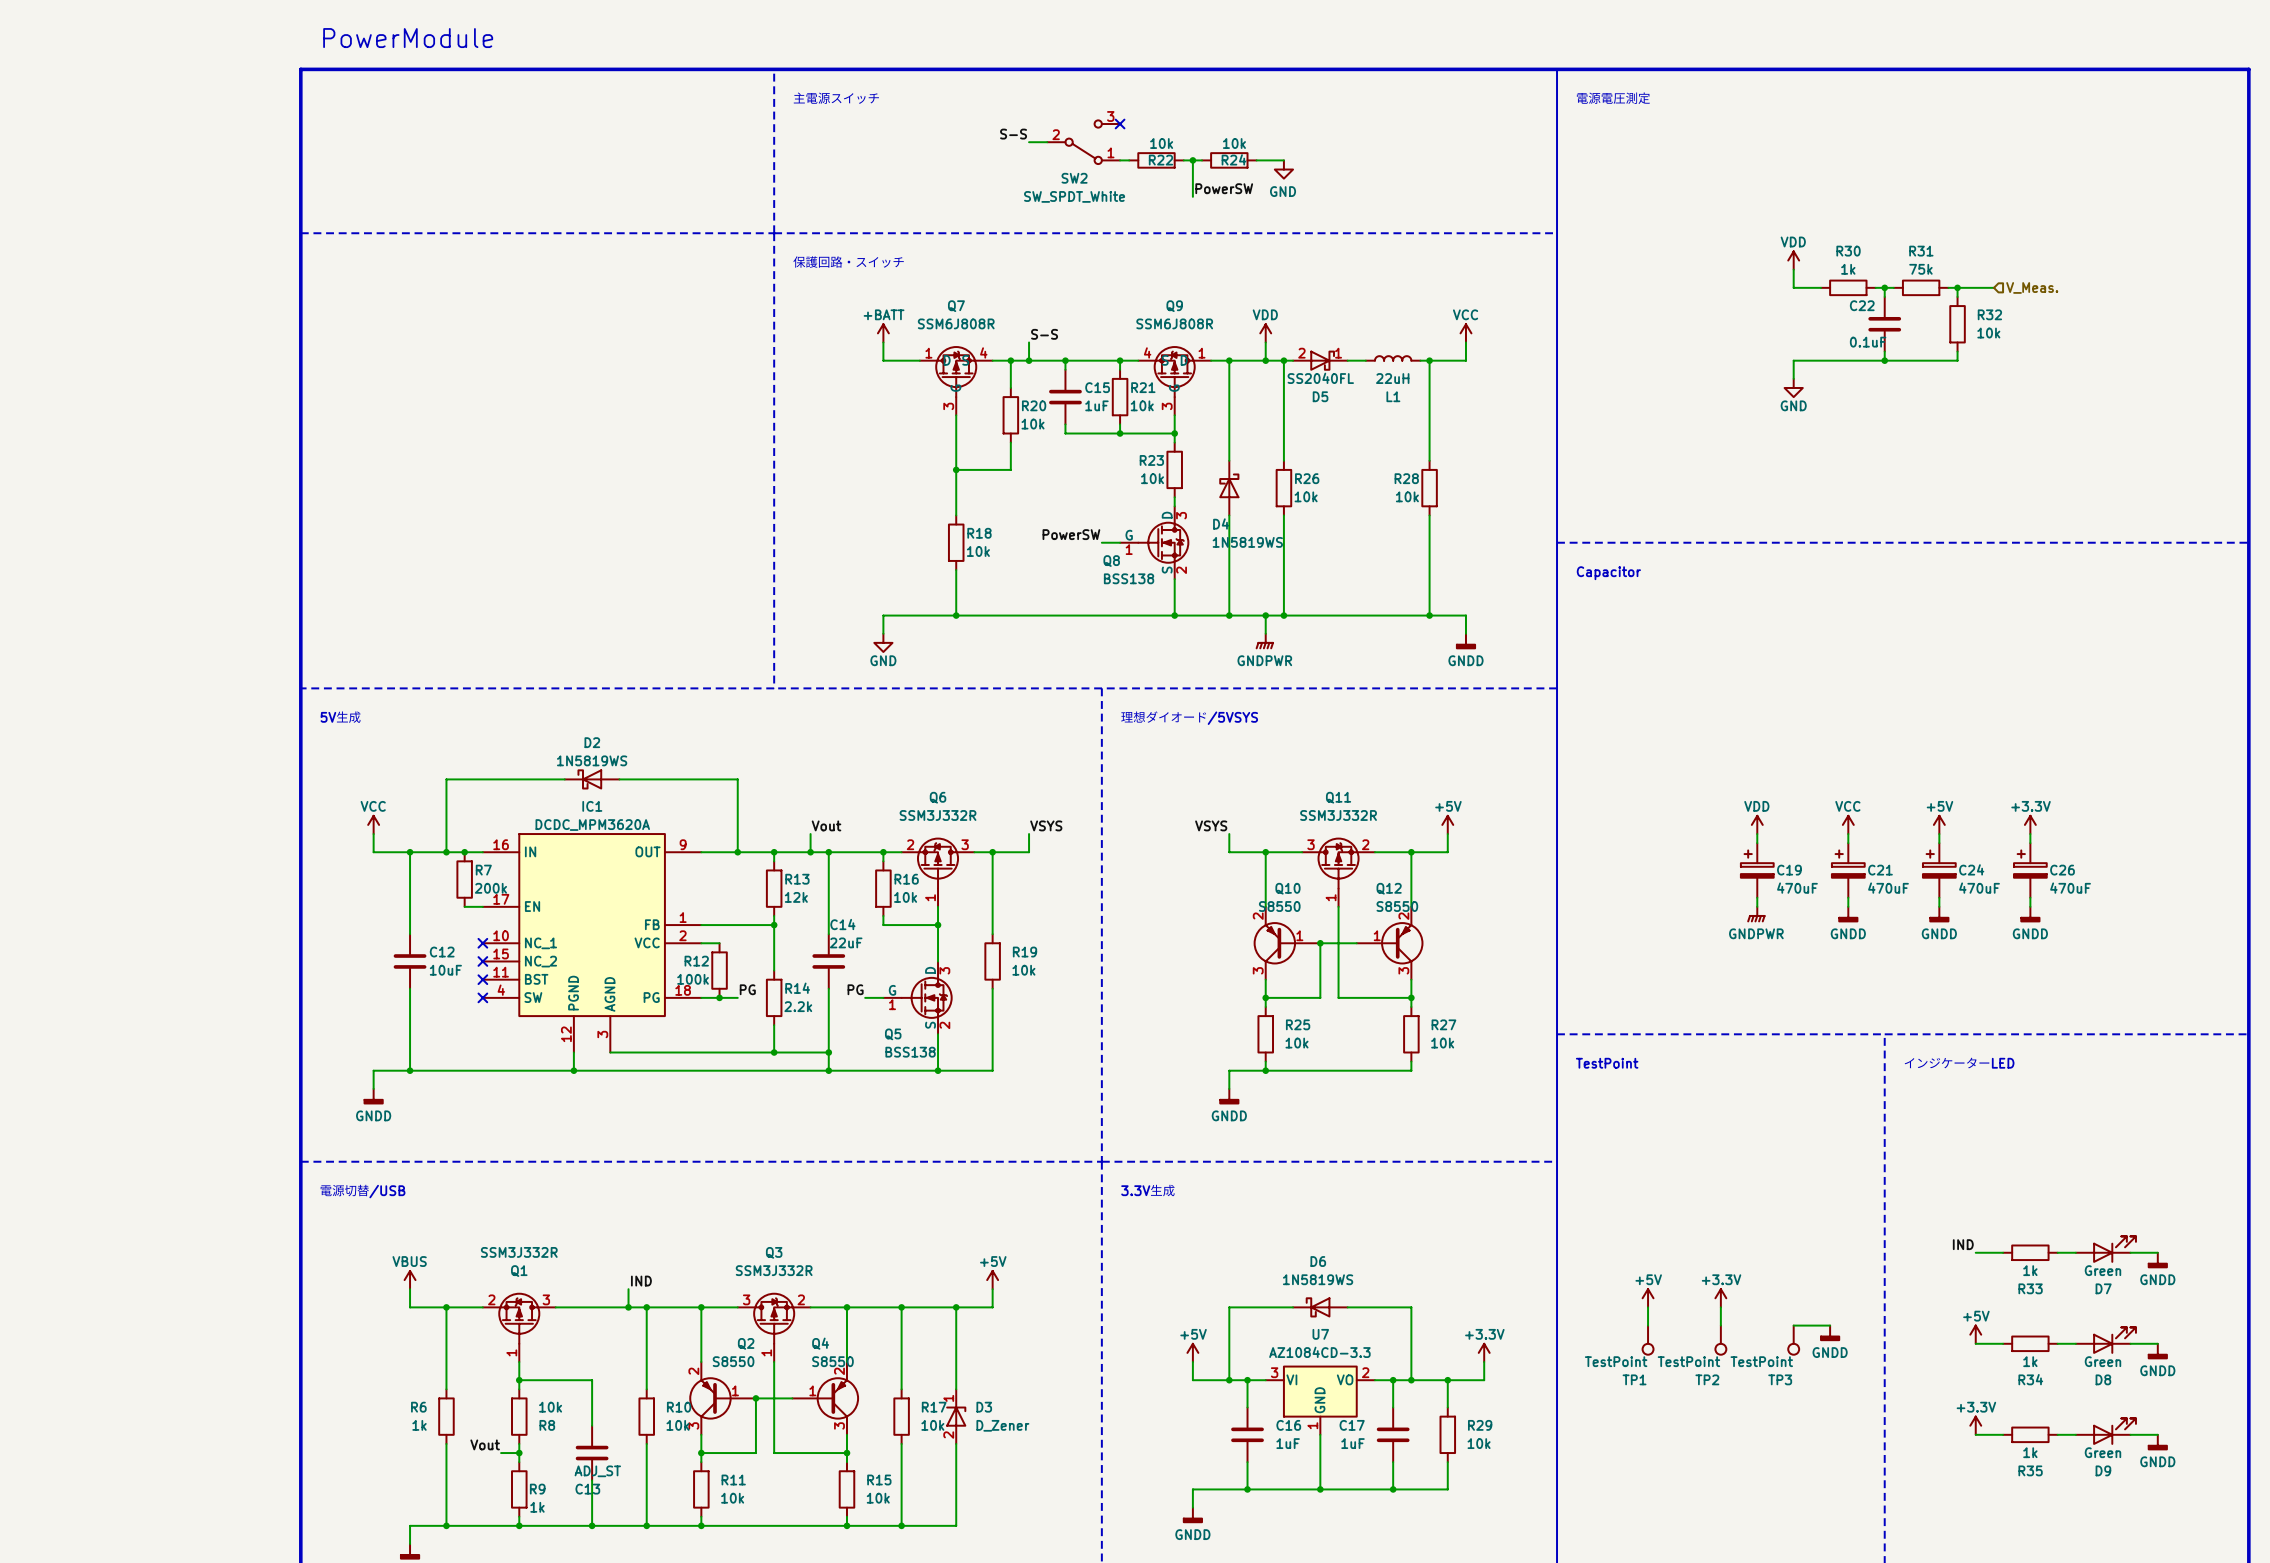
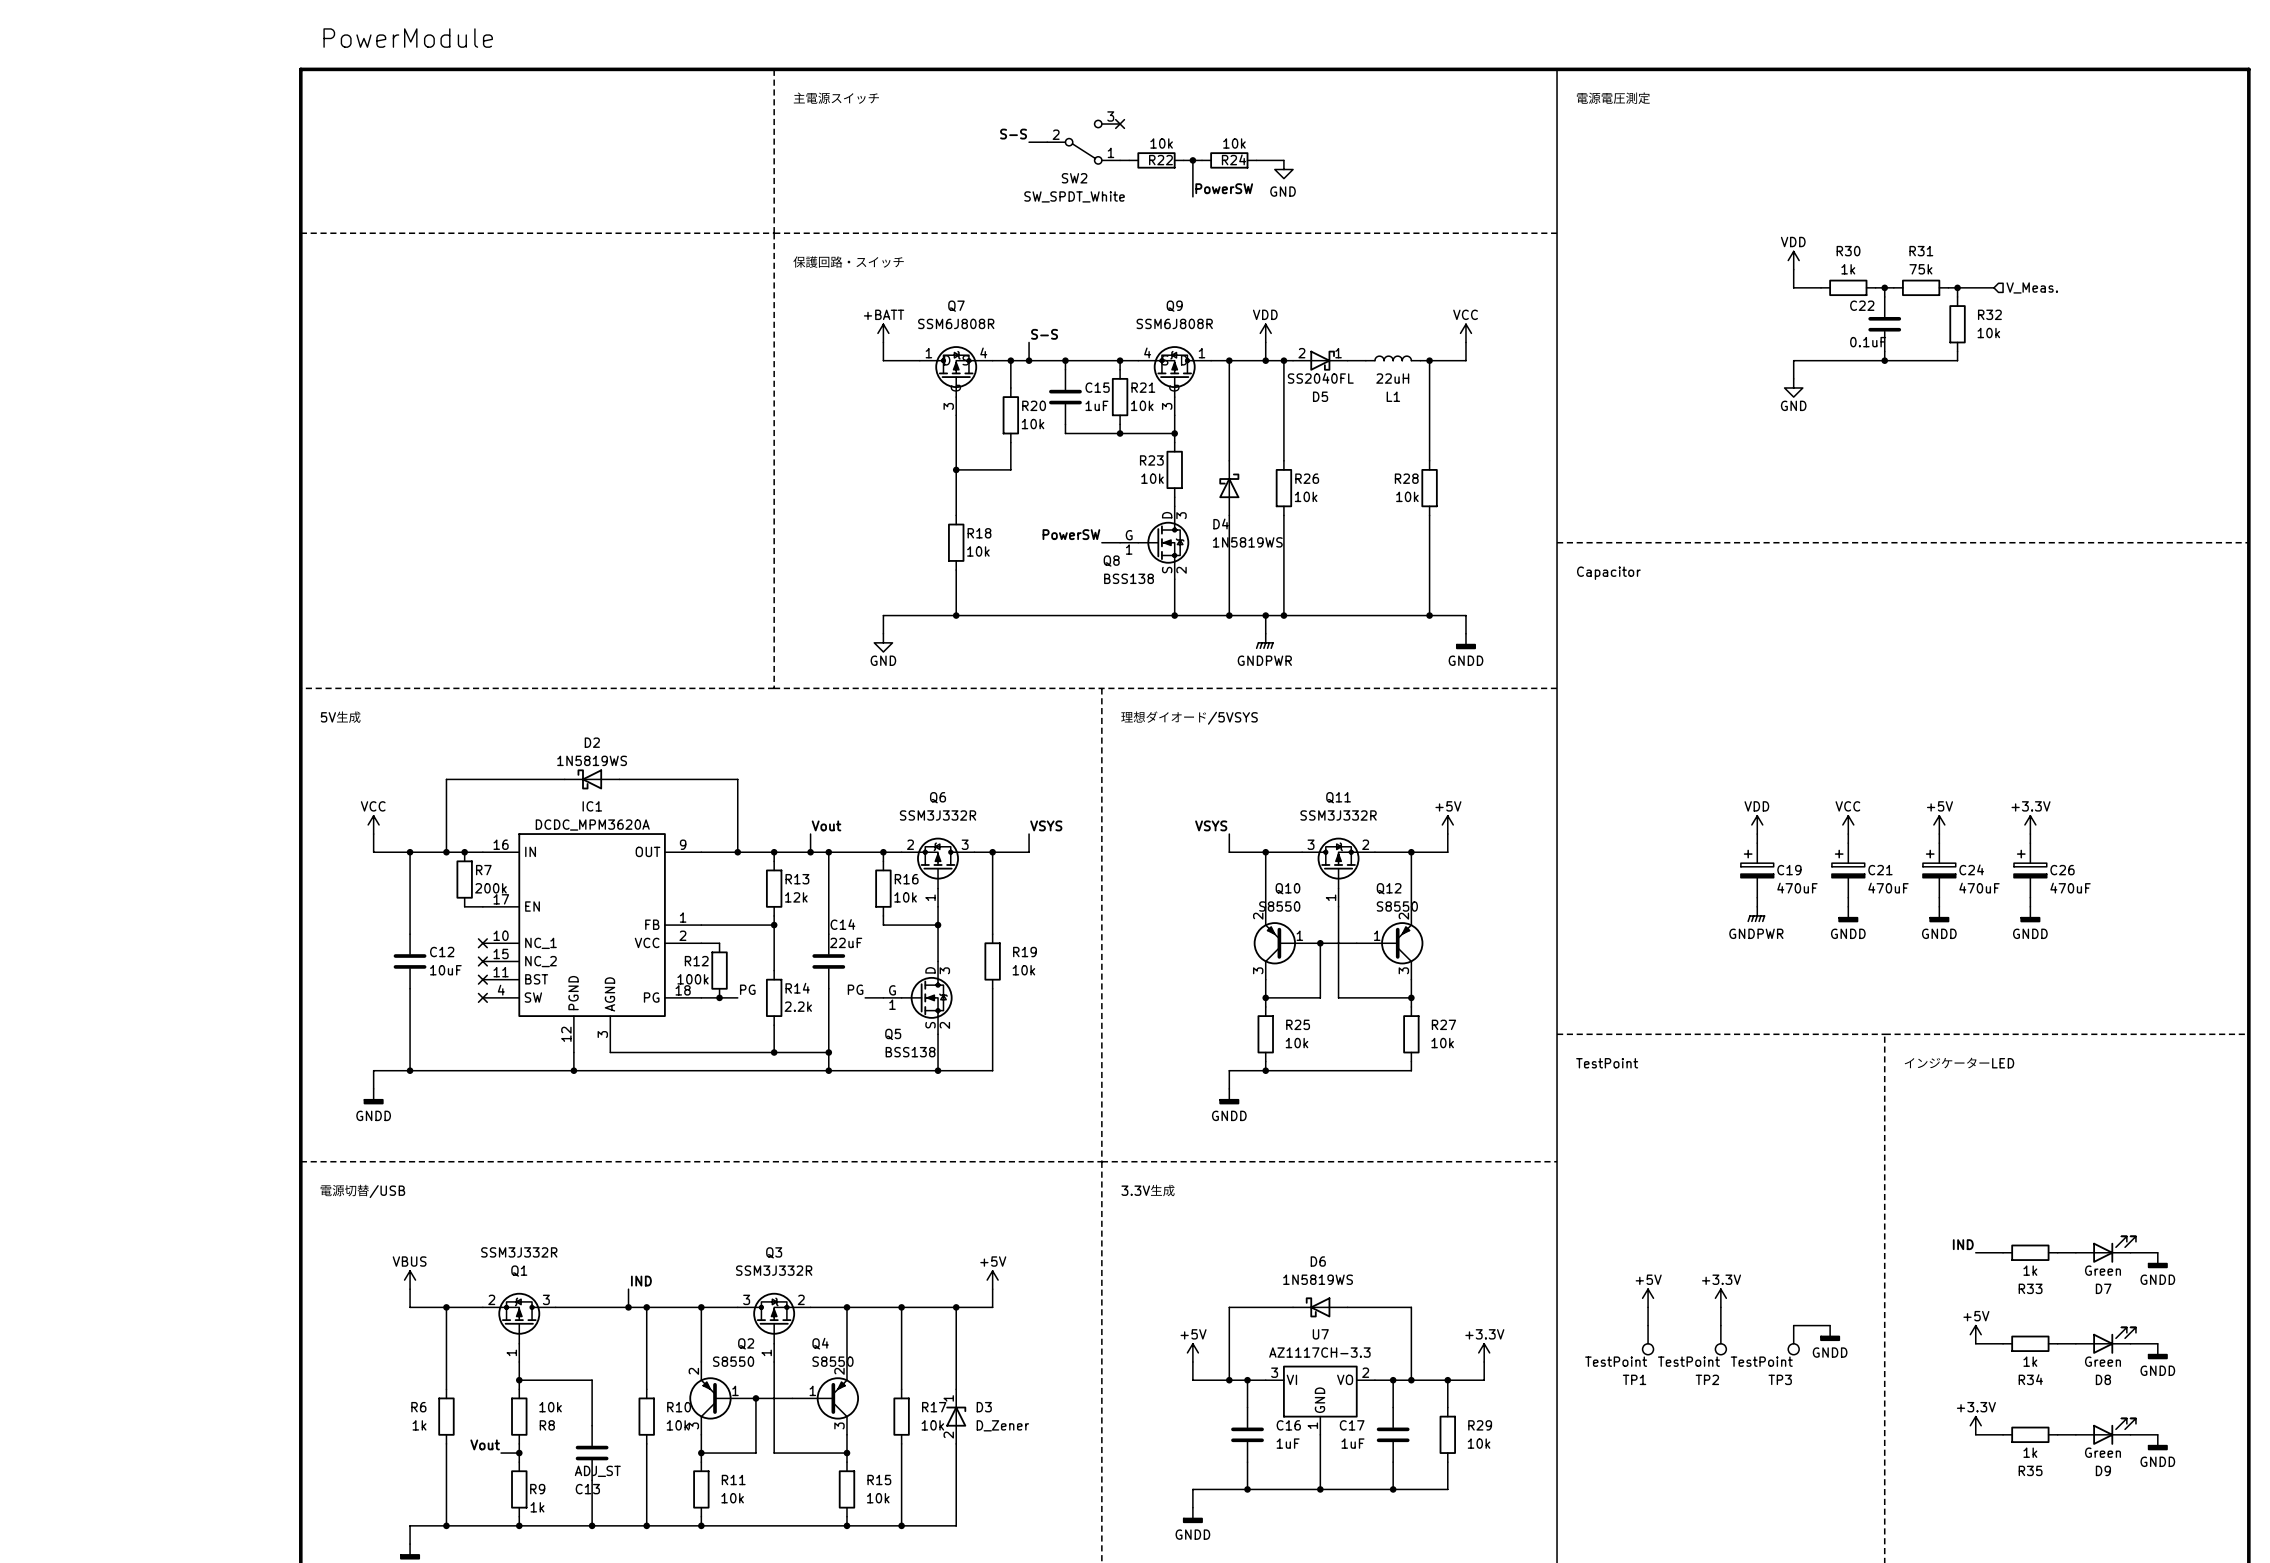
U7 value: AZ1084CD-3.3 (1319, 1352) -> AZ1117CH-3.3 (1319, 1352)

